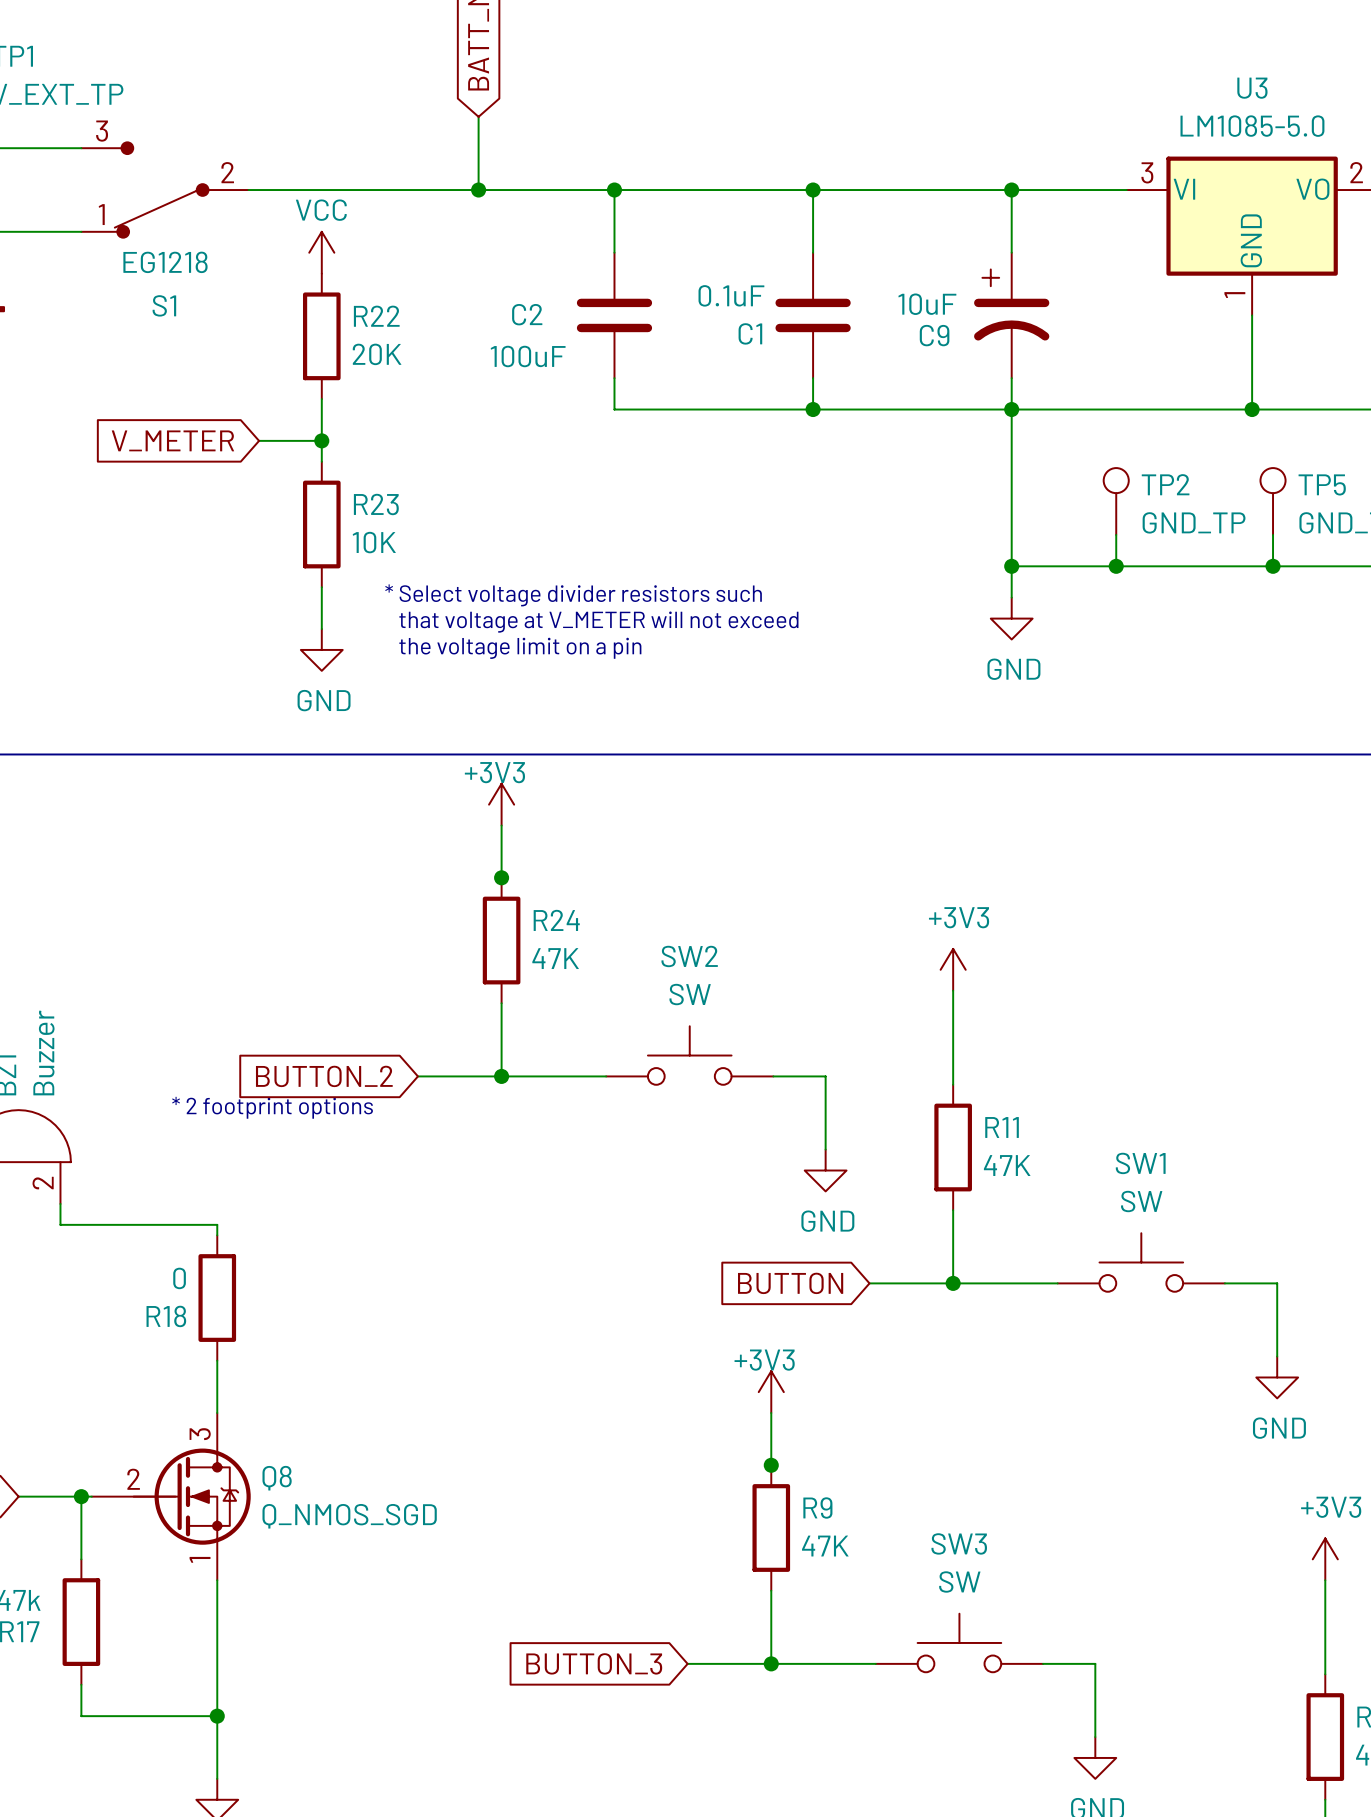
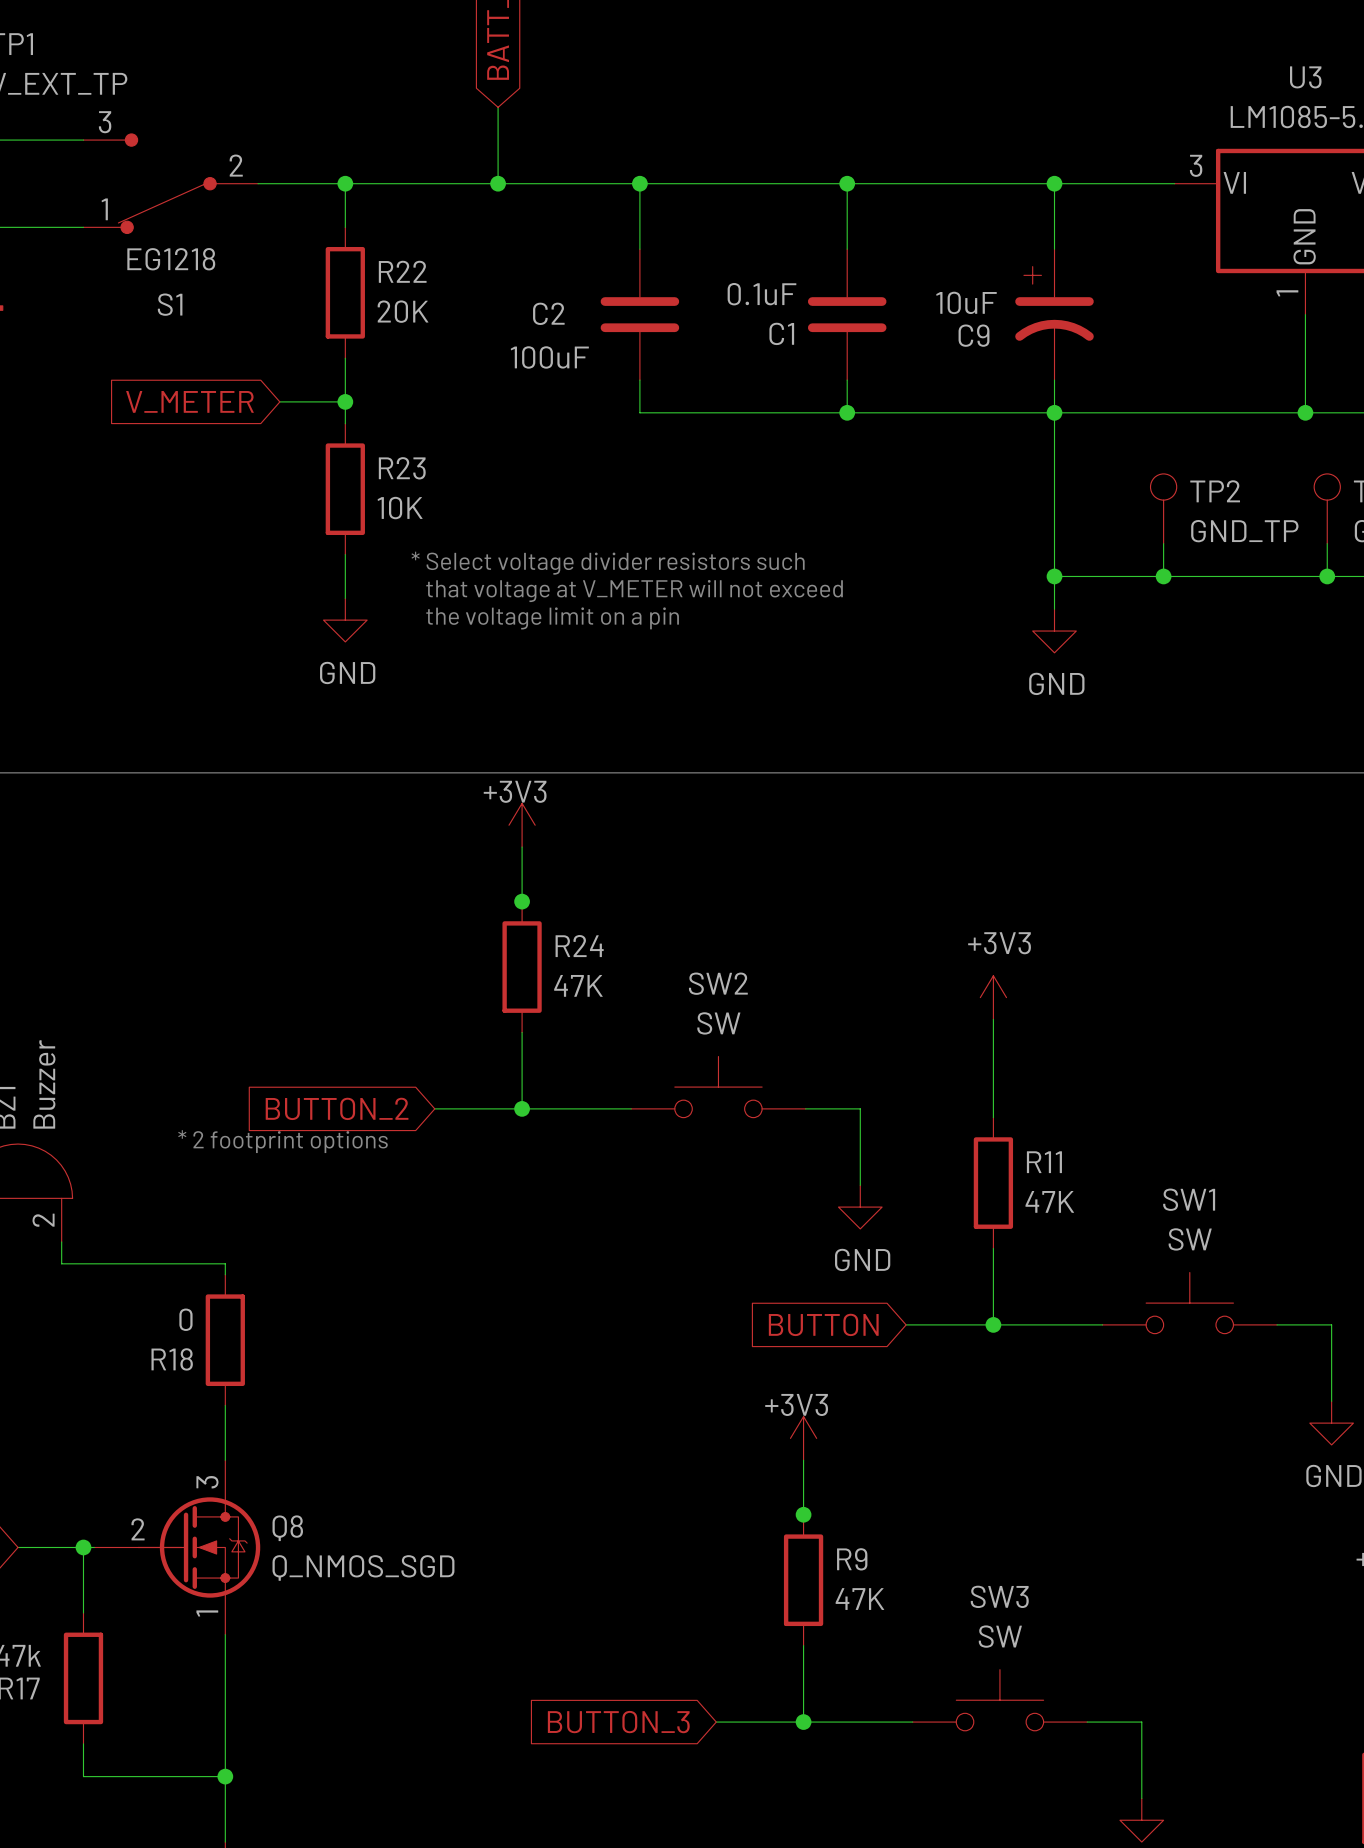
wire: none -> (345, 183) (345, 227)
junction: none -> (345, 183)
power symbol: VCC (321, 252) -> none
R22 position: (321, 336) -> (345, 292)
wire: (321, 399) (321, 461) -> (345, 358) (345, 423)
global label position: V_METER (172, 440) -> V_METER (189, 401)
wire: (259, 440) (321, 440) -> (279, 401) (345, 401)
junction position: (321, 440) -> (345, 401)
R23 position: (321, 524) -> (345, 489)
wire: (321, 587) (321, 629) -> (345, 554) (345, 598)
text position: * Select voltage divider resistors such (573, 595) -> * Select voltage divider resistors such (608, 563)
text position: that voltage at V_METER will not exceed (598, 622) -> that voltage at V_METER will not exceed (634, 591)
text position: the voltage limit on a pin (520, 648) -> the voltage limit on a pin (552, 618)
power symbol position: GND (321, 649) -> GND (345, 620)

